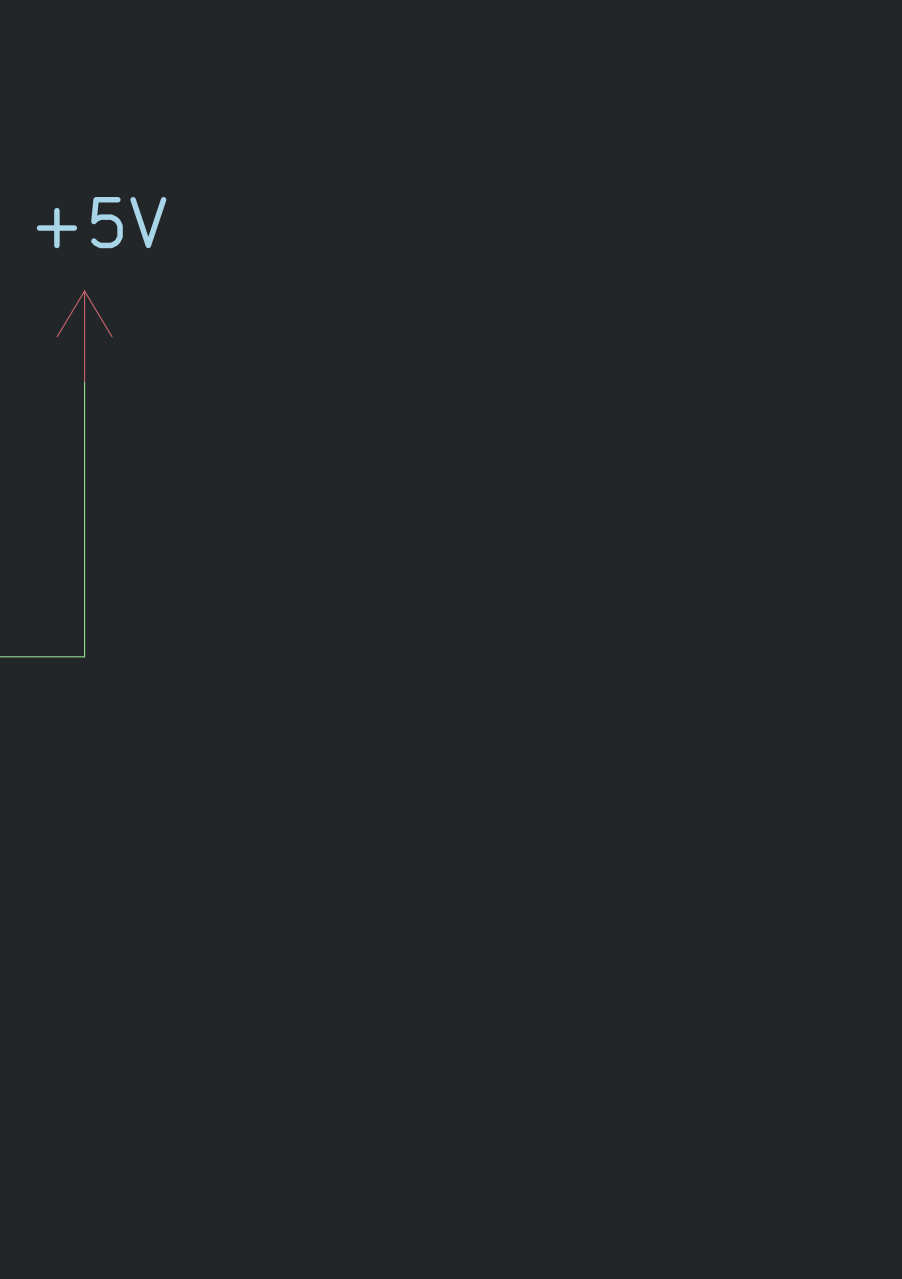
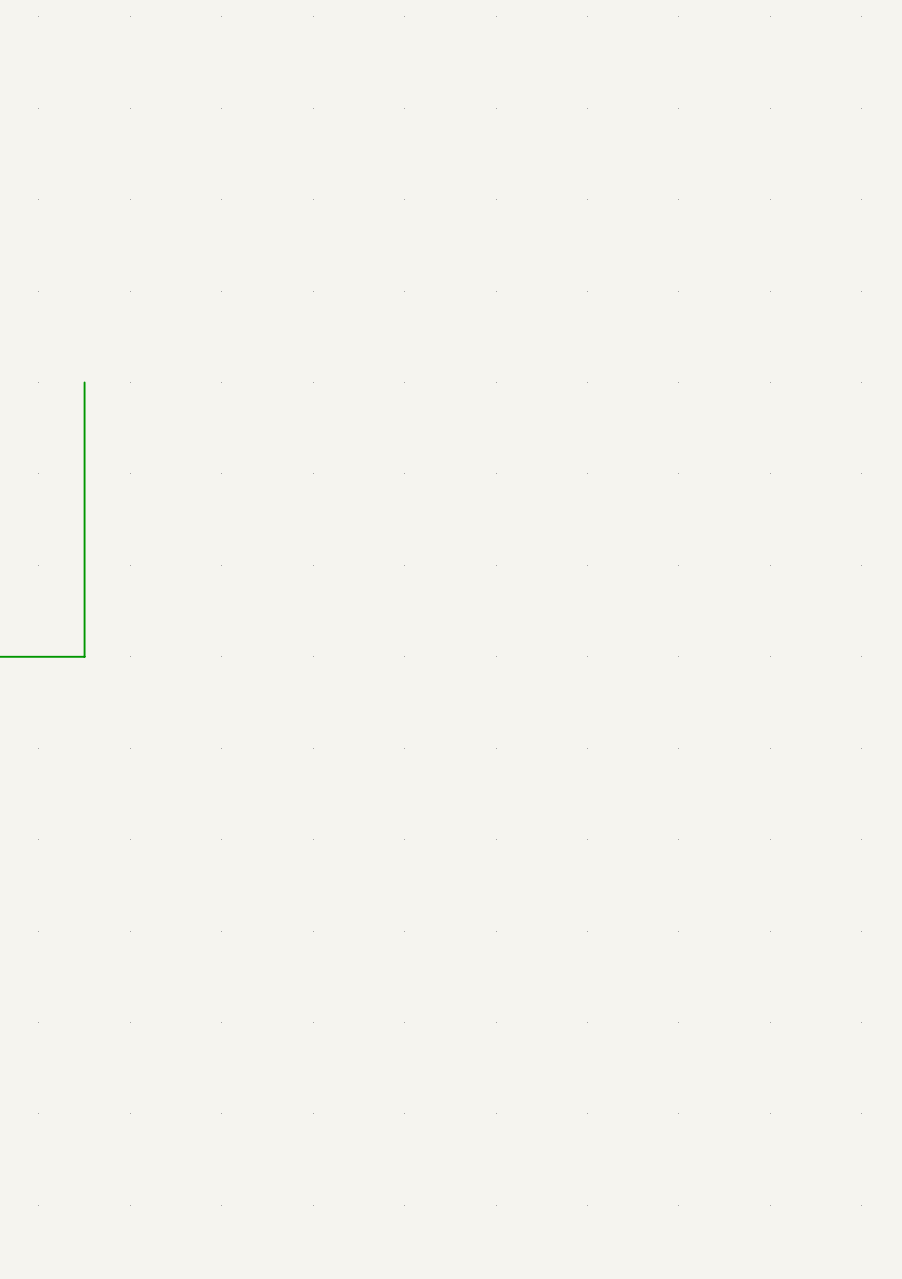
power symbol: +5V (84, 336) -> none

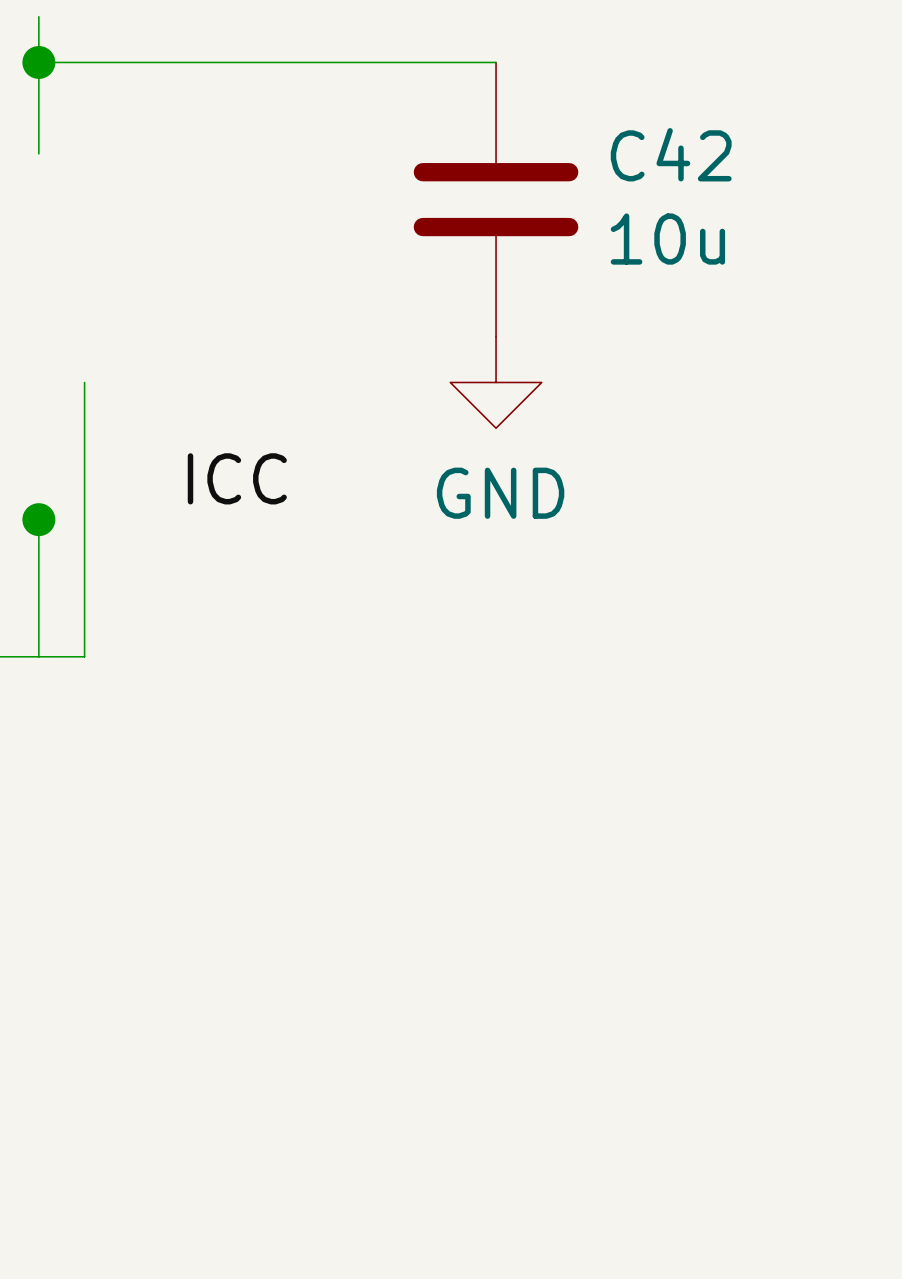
wire: none -> (38, 16) (38, 153)
wire: none -> (38, 62) (496, 62)
junction: none -> (38, 62)
C42: none -> 10u (496, 199)
power symbol: none -> GND (496, 382)
label: none -> ICC (237, 478)
wire: none -> (38, 519) (38, 656)
junction: none -> (38, 519)

